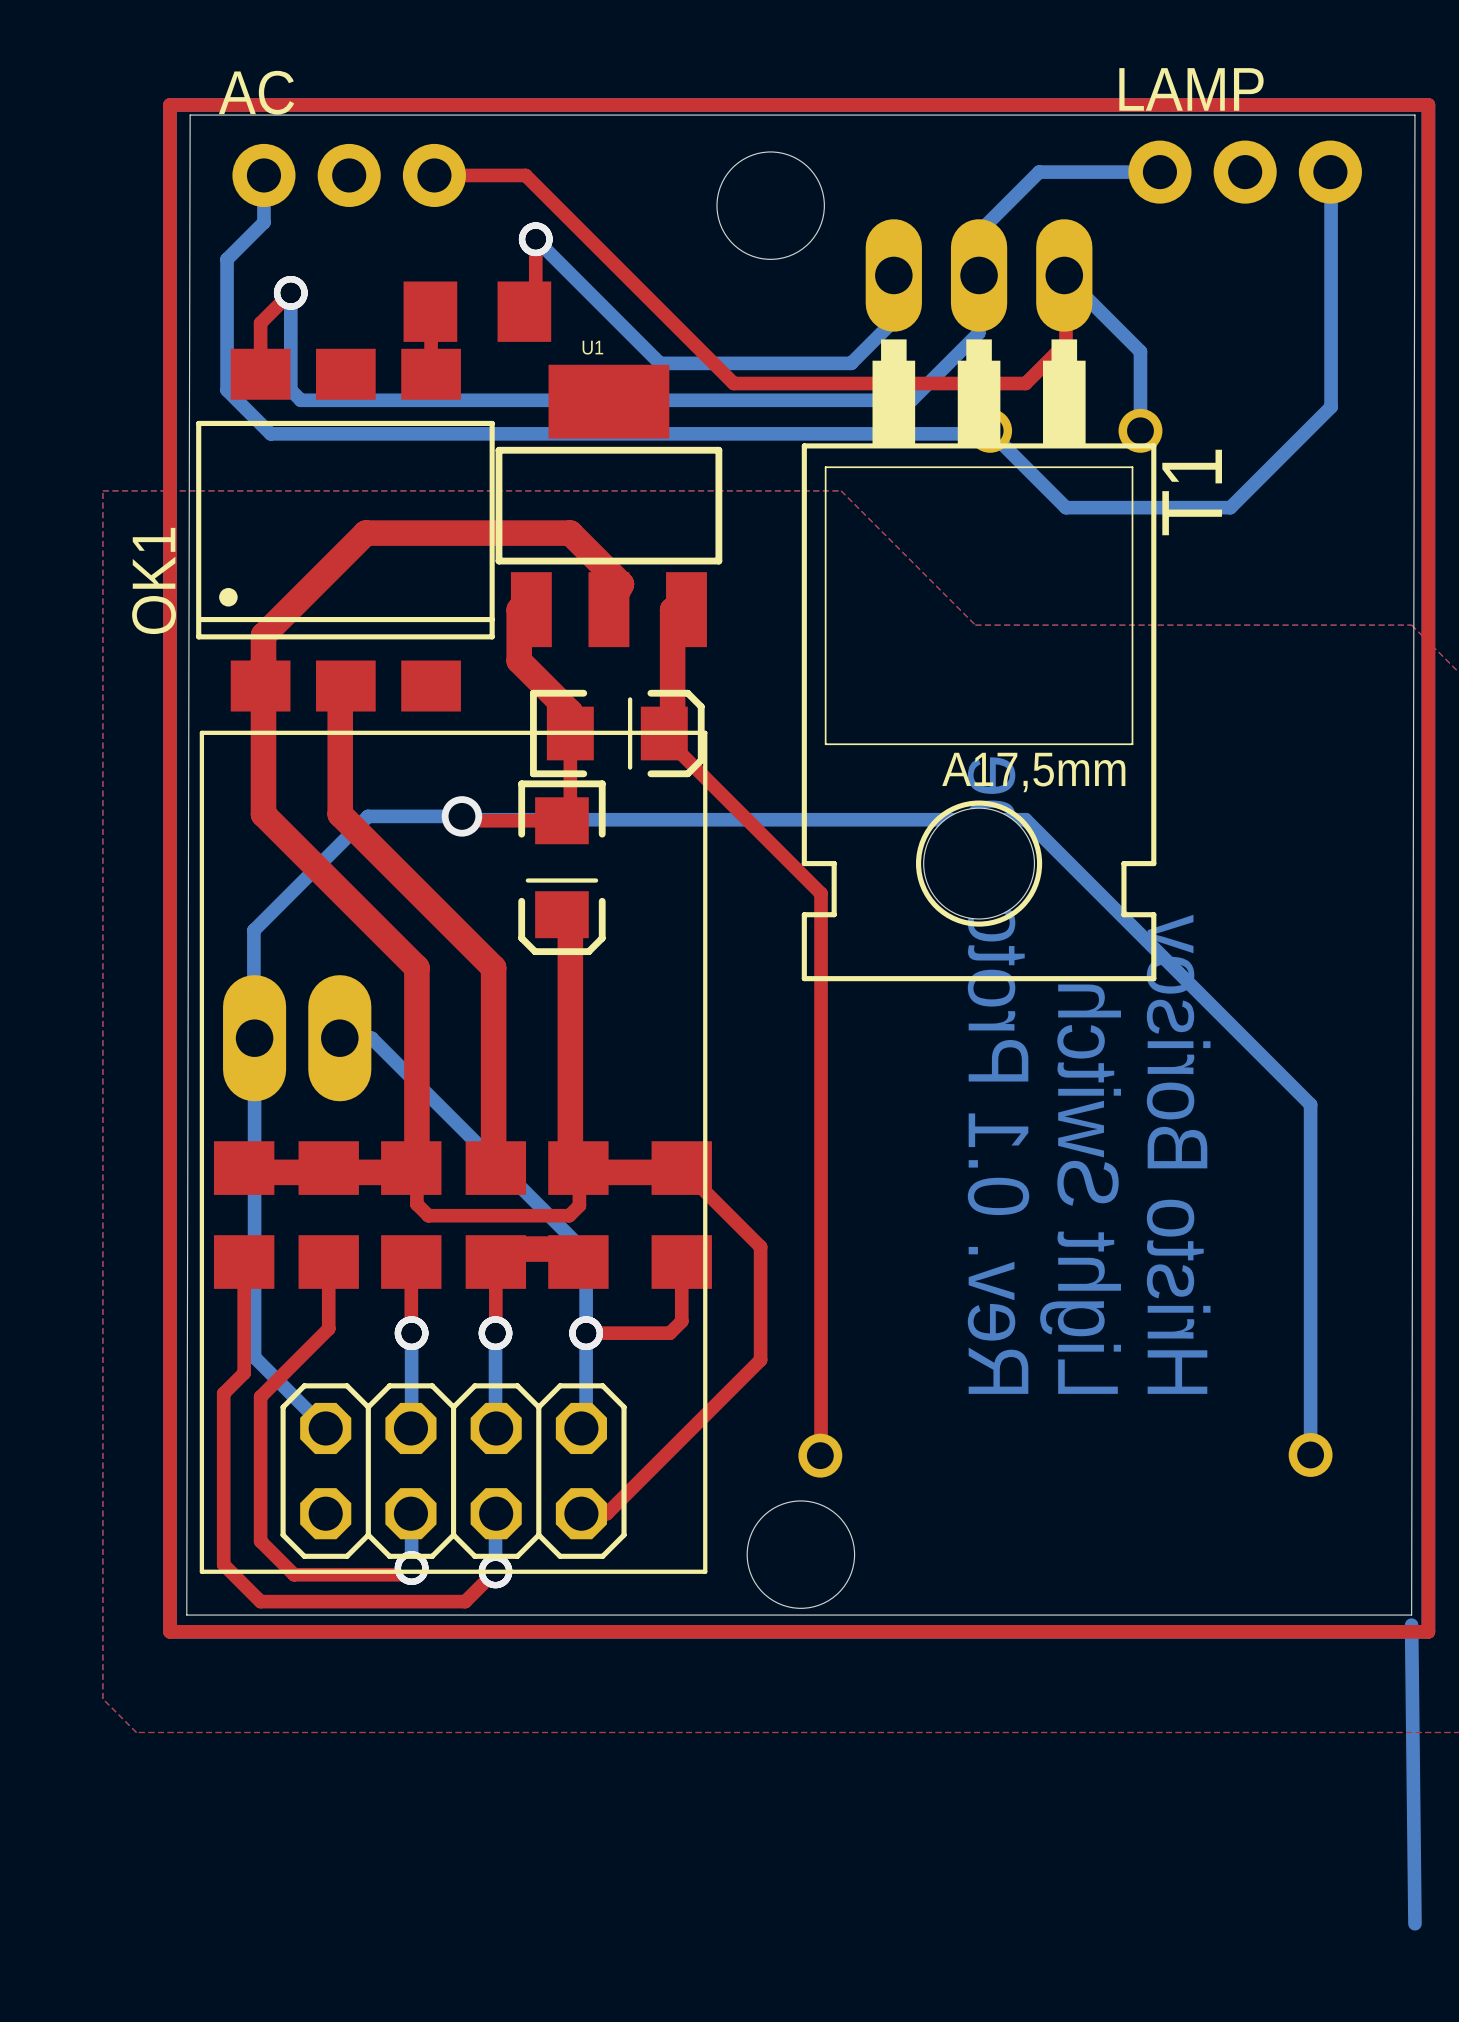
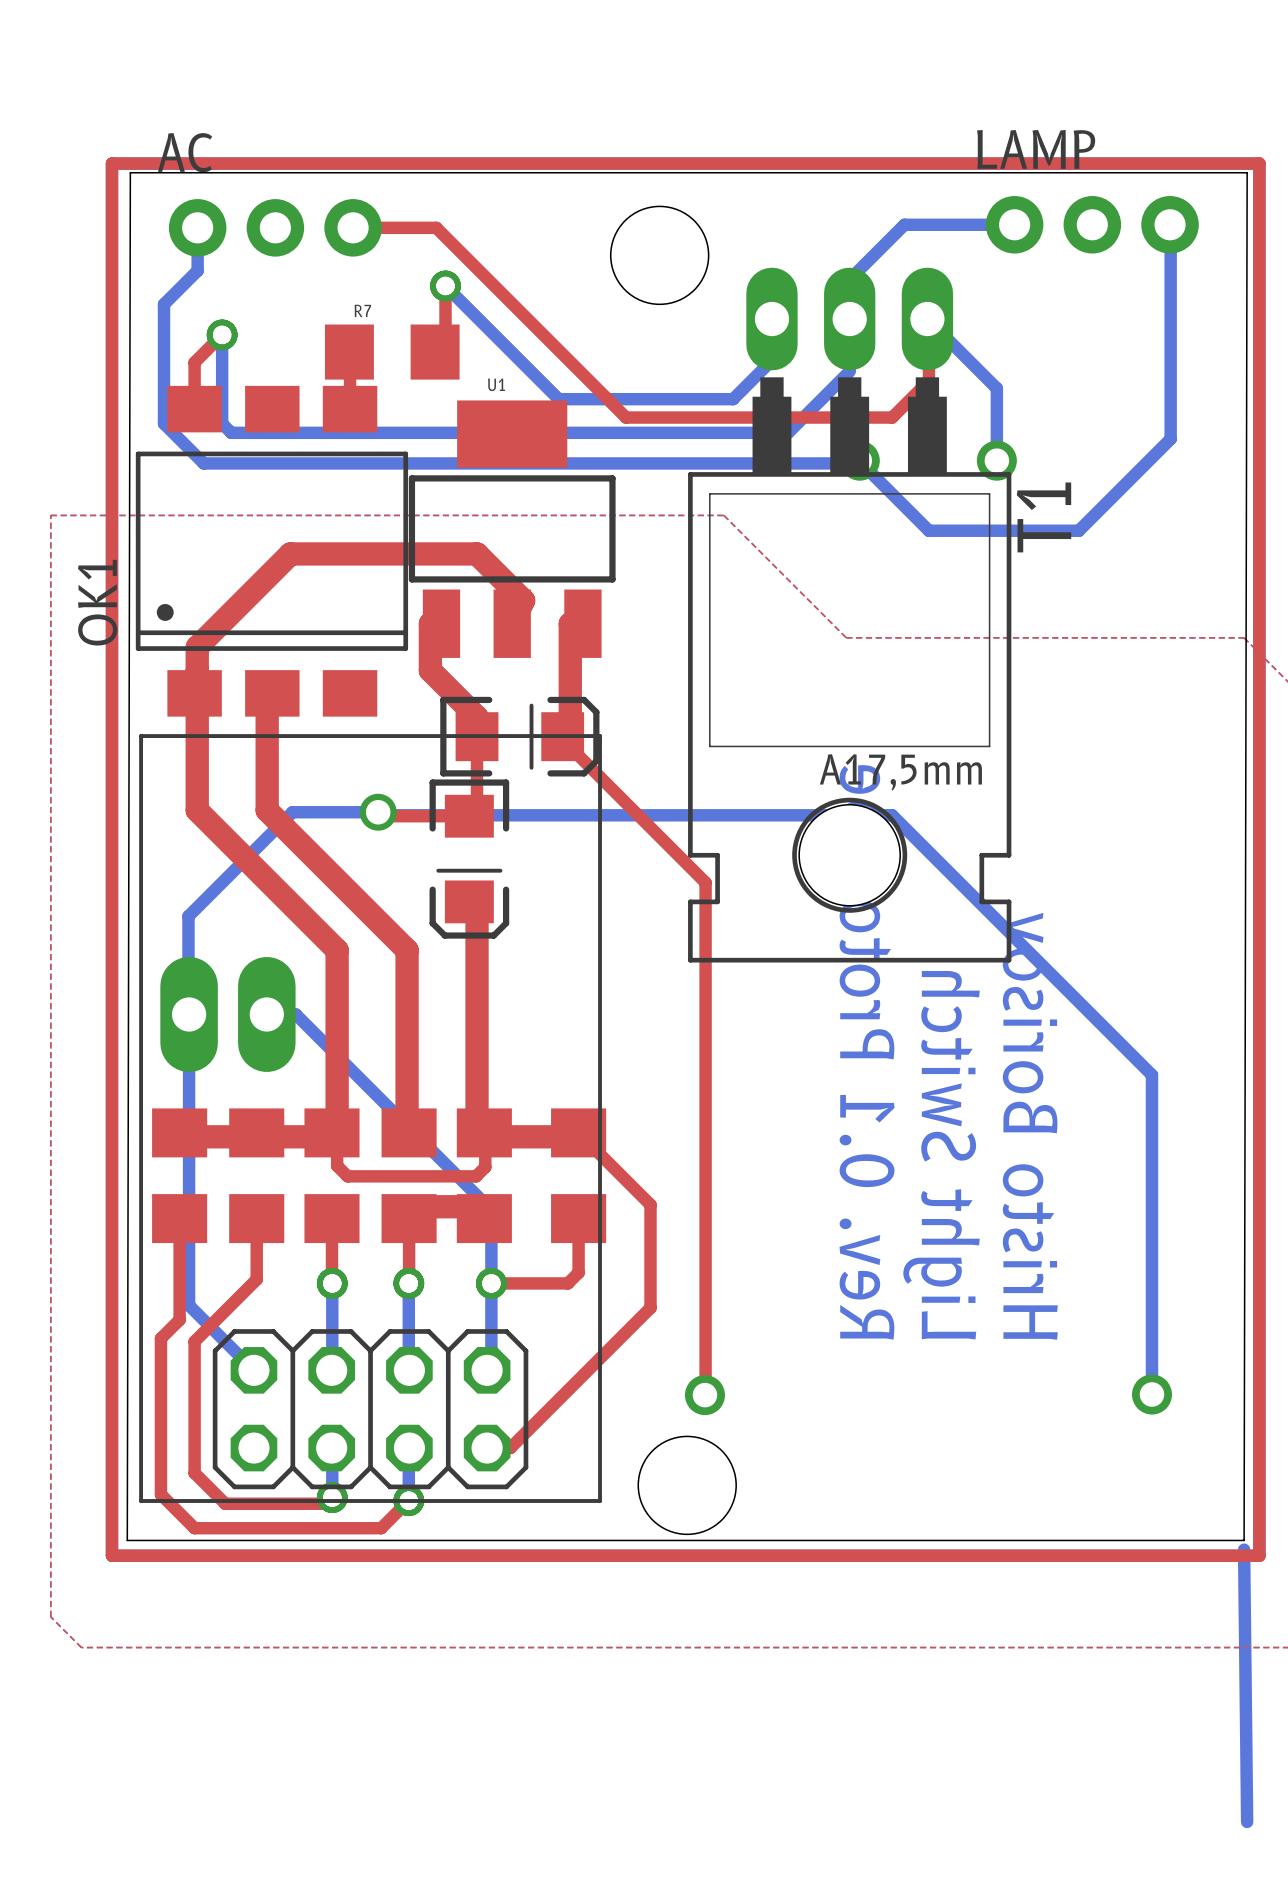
R7 name: none -> R7 (362, 310)

